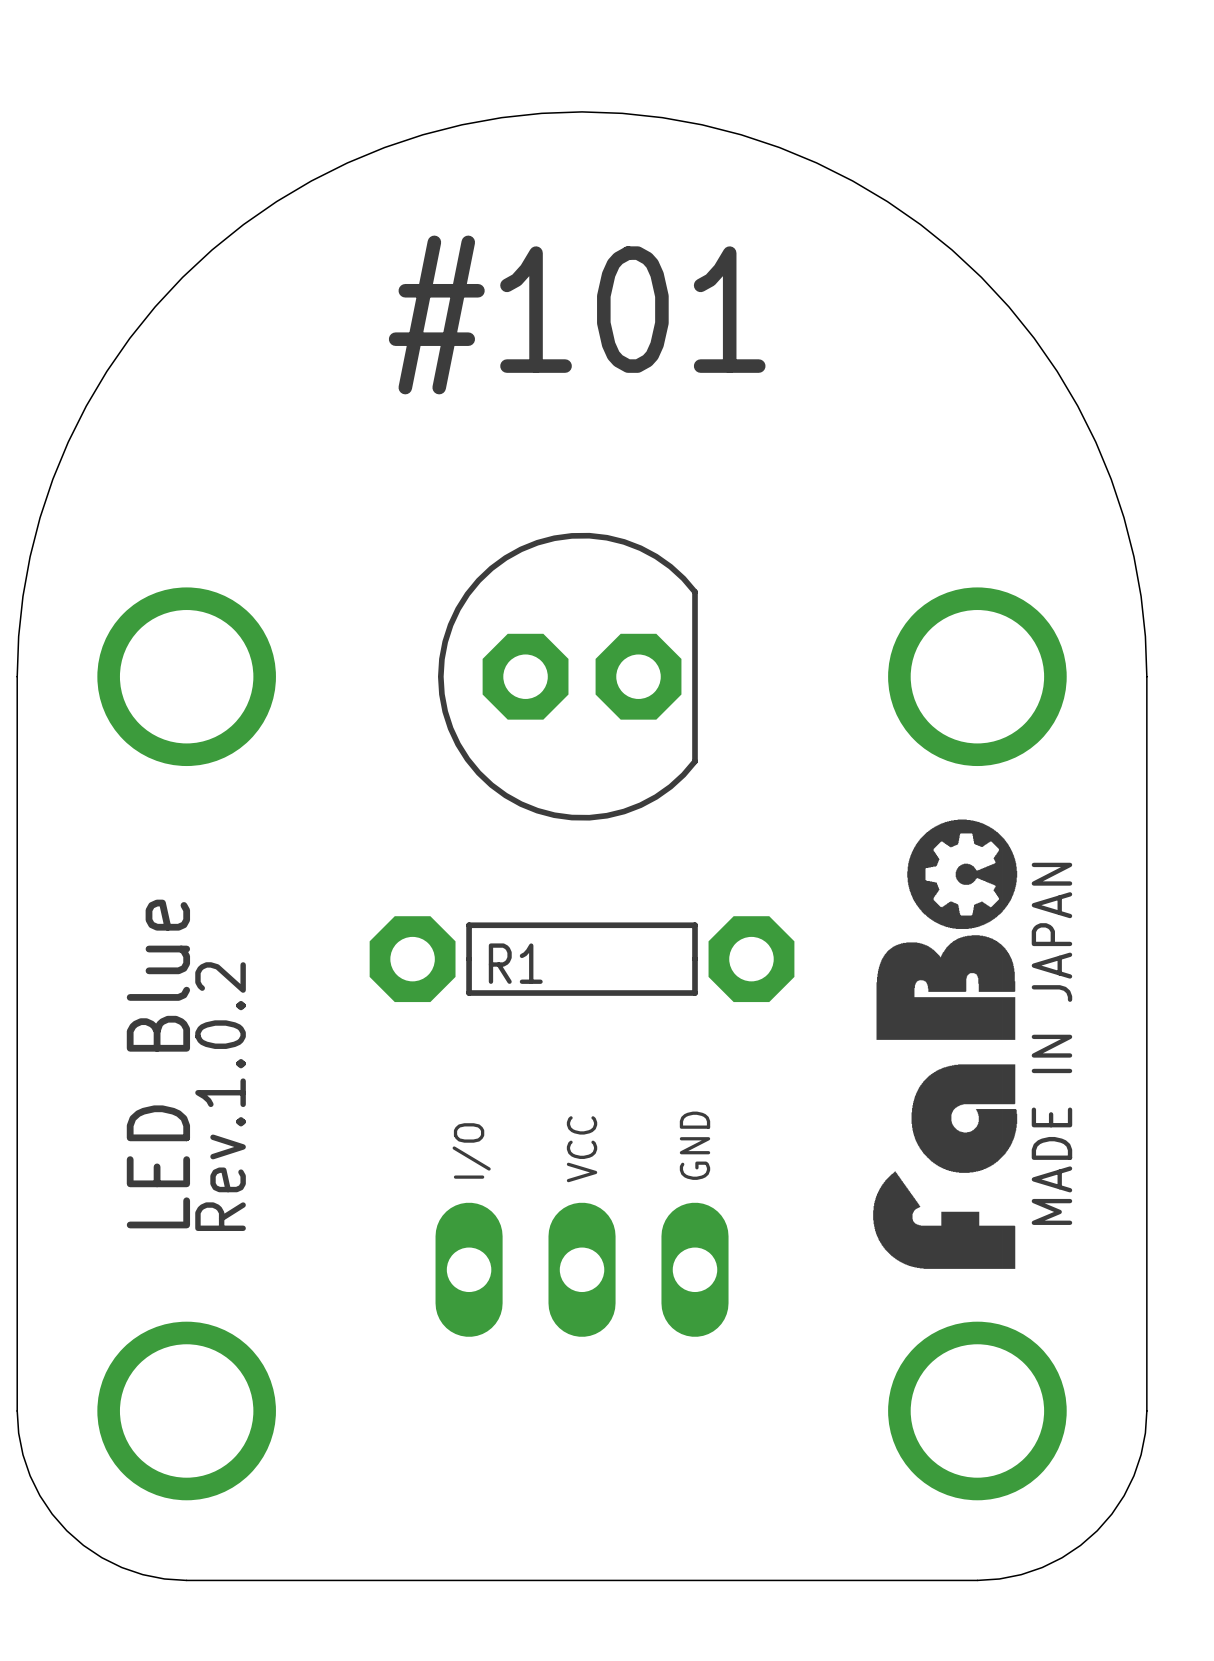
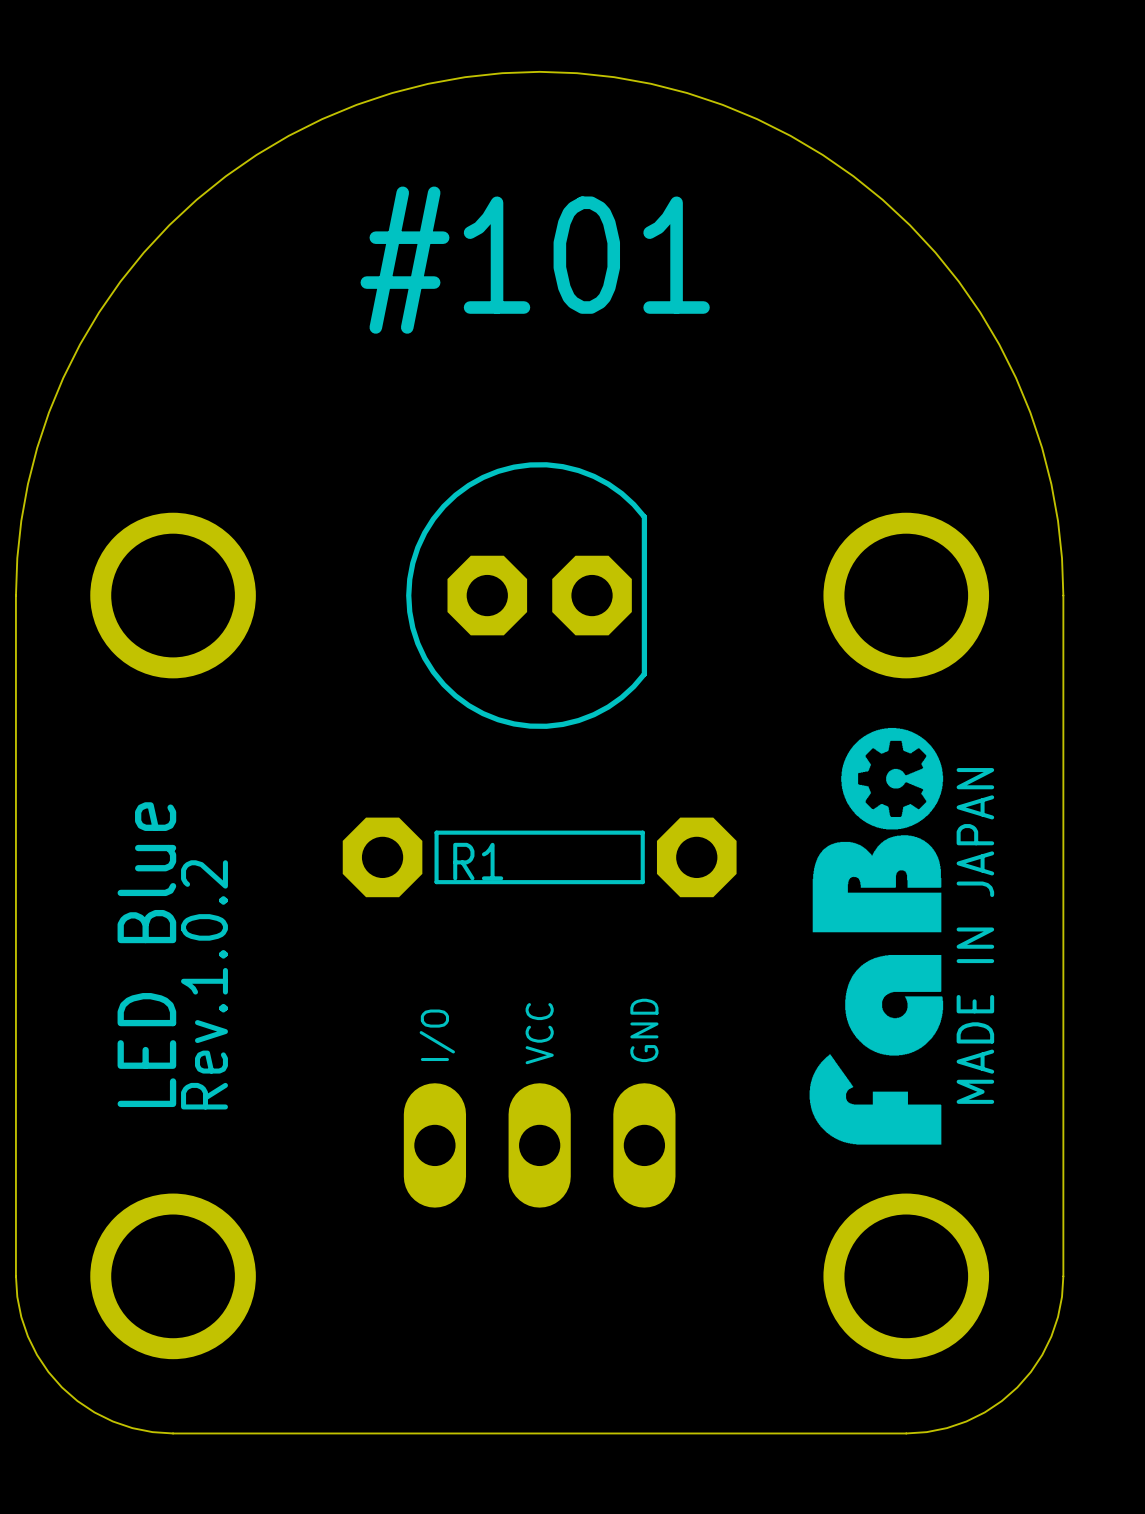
R1 footprint: [369, 916, 795, 1003] -> [342, 817, 737, 898]

